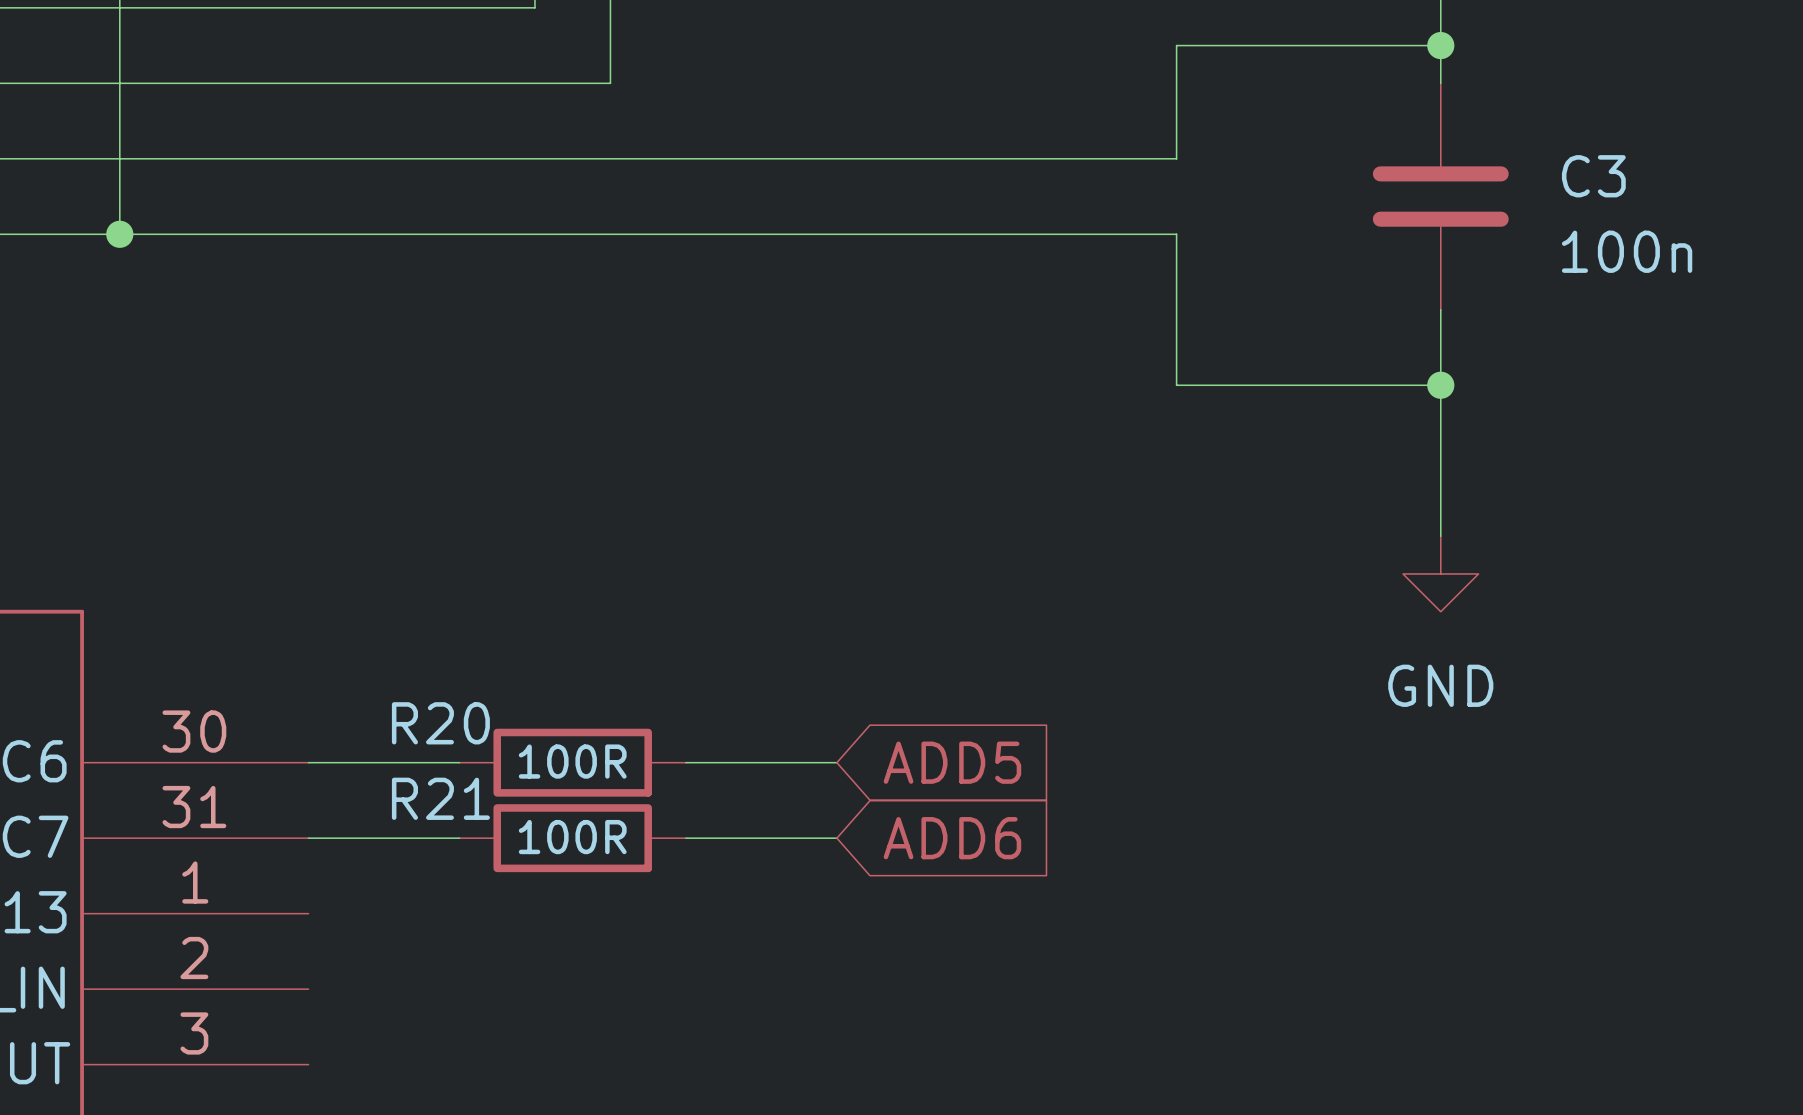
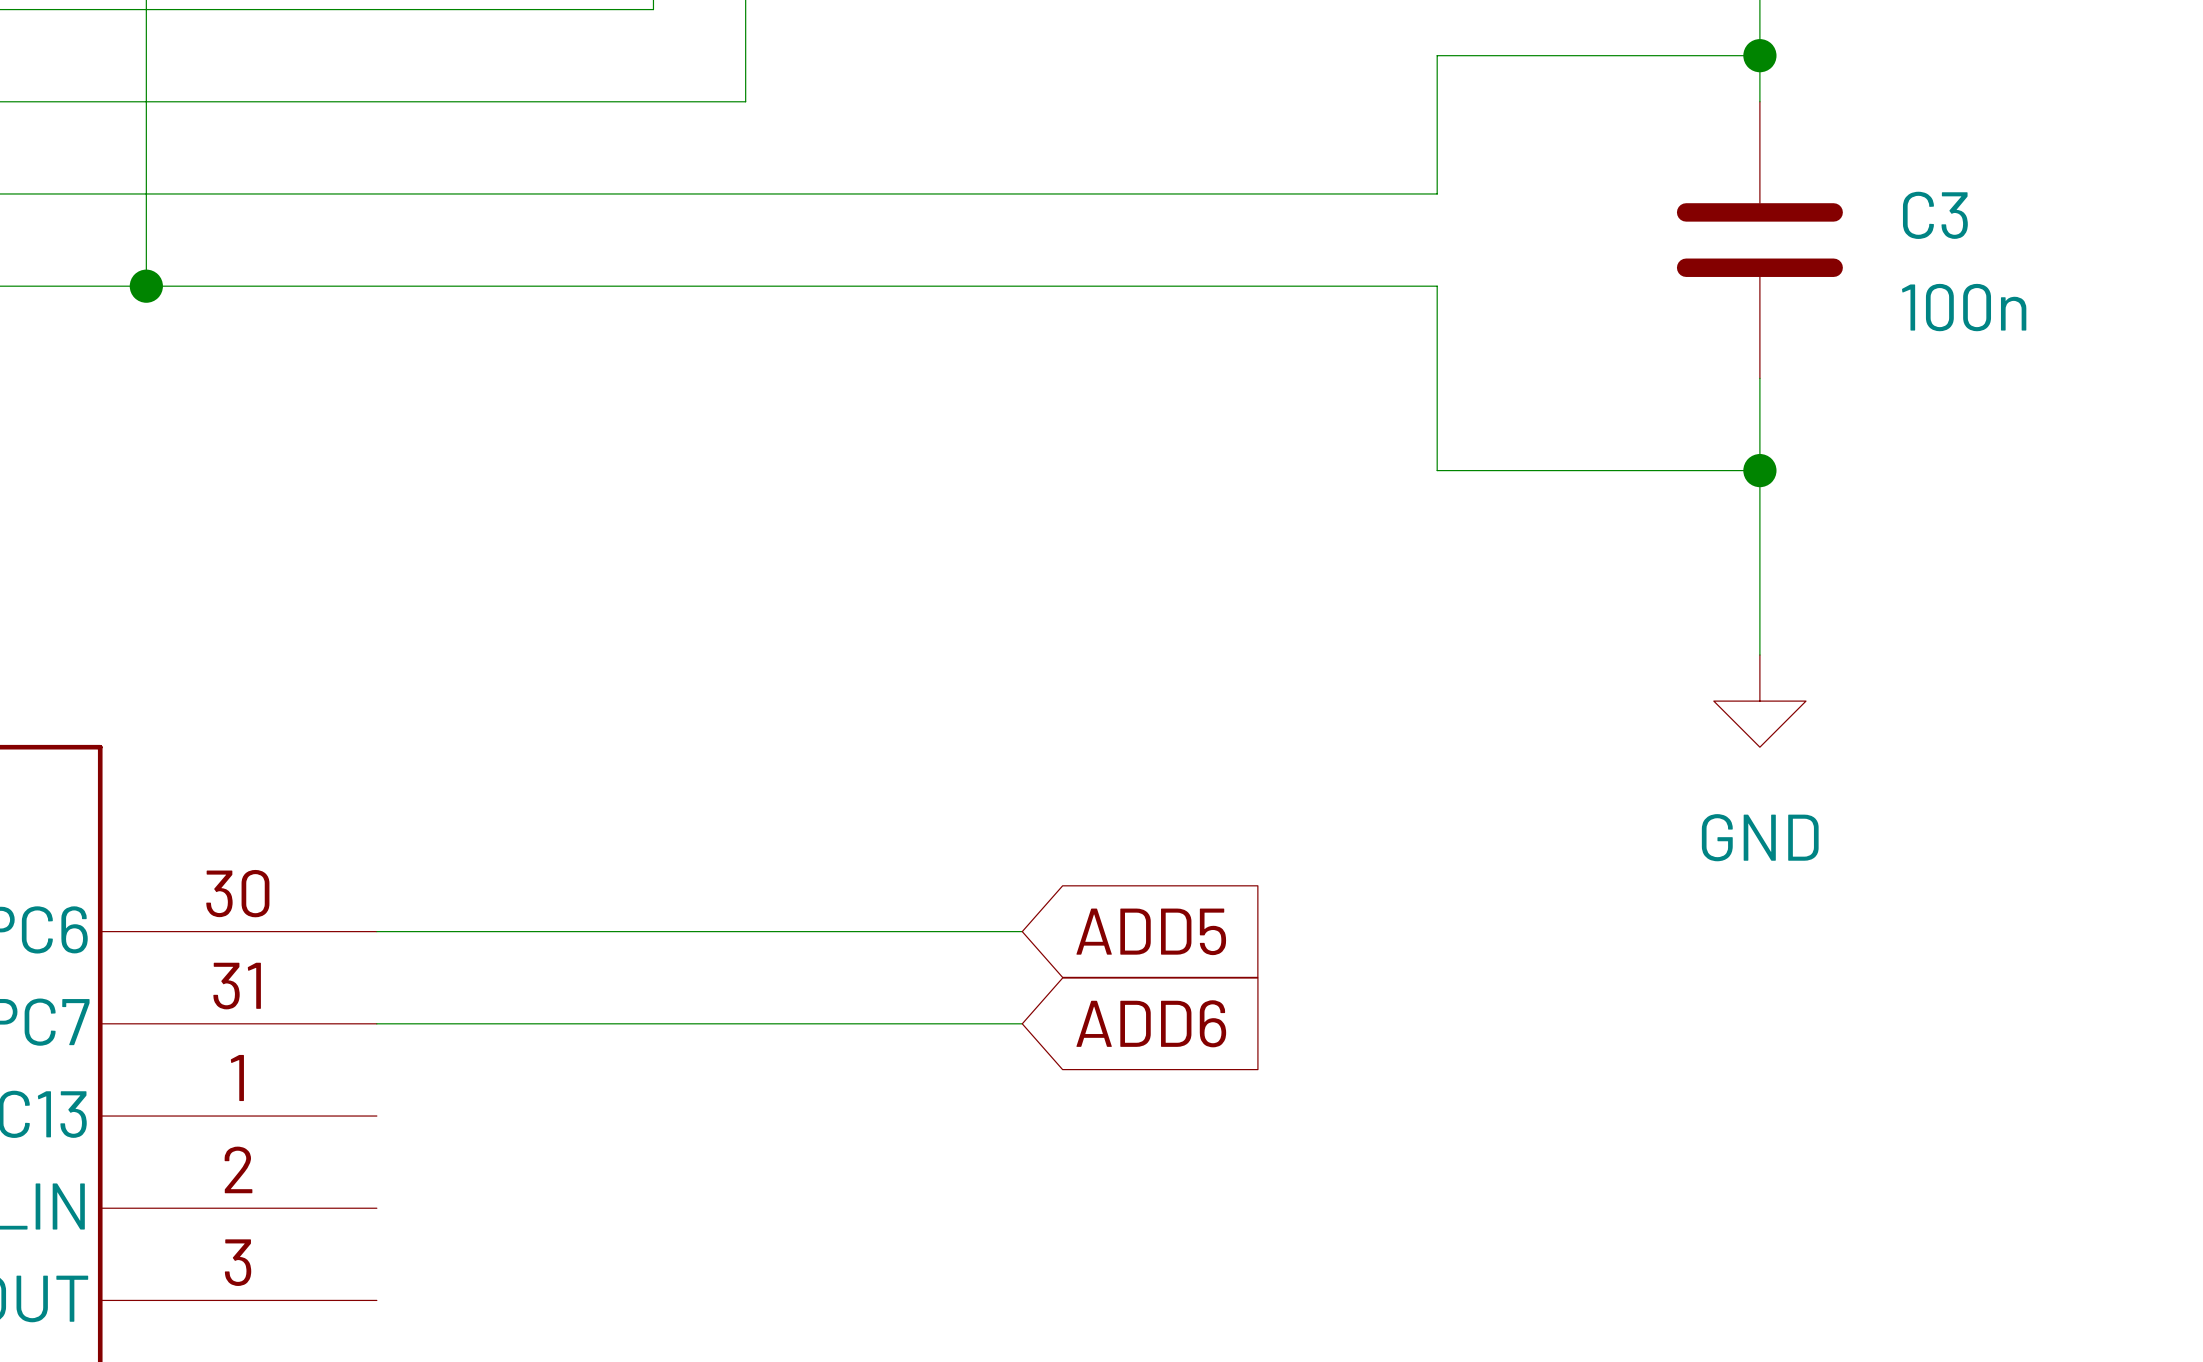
wire: none -> (561, 931) (837, 931)
R20: 100R (572, 762) -> none
wire: none -> (561, 1023) (837, 1023)
R21: 100R (572, 838) -> none

